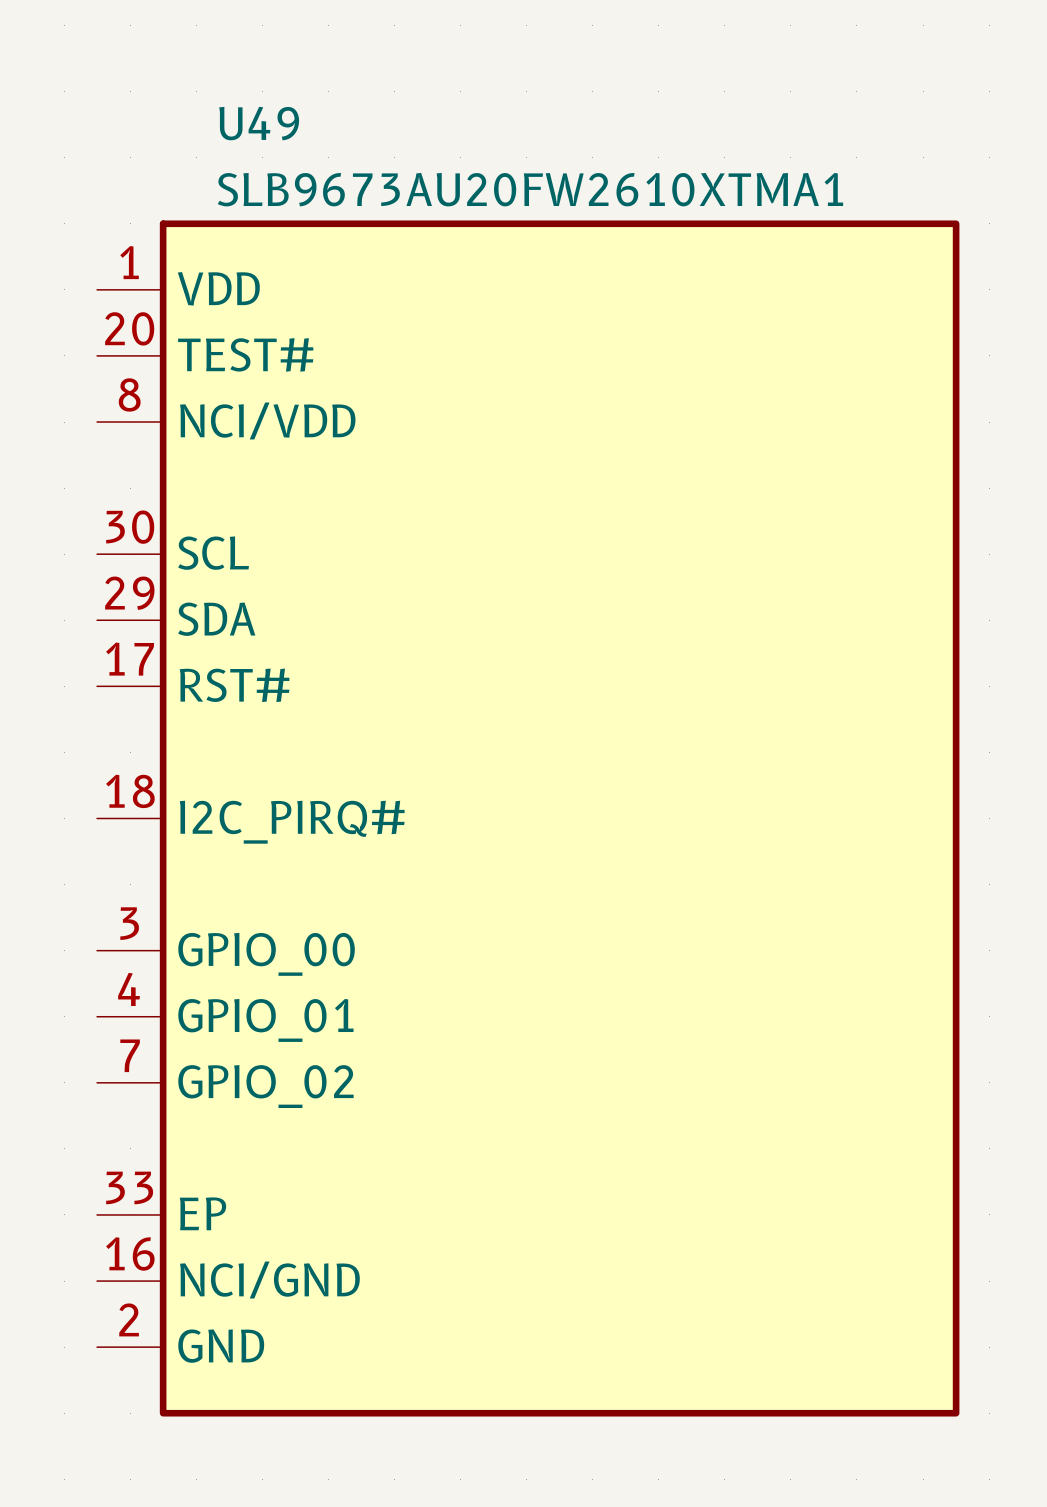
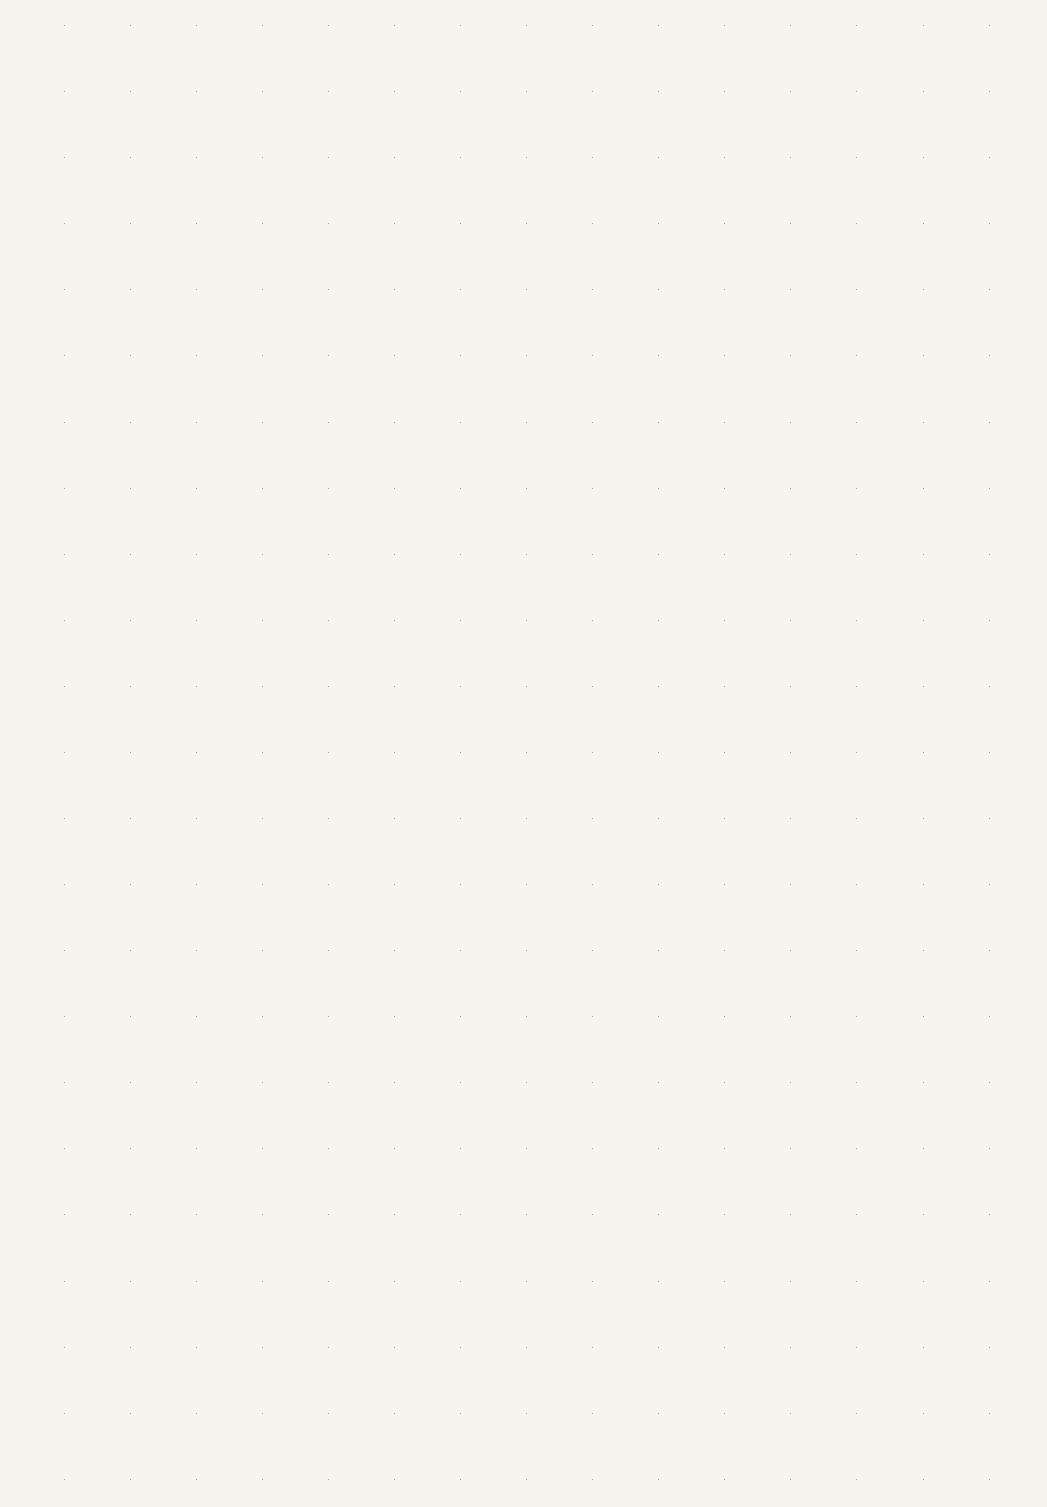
U49: (528, 818) -> none

